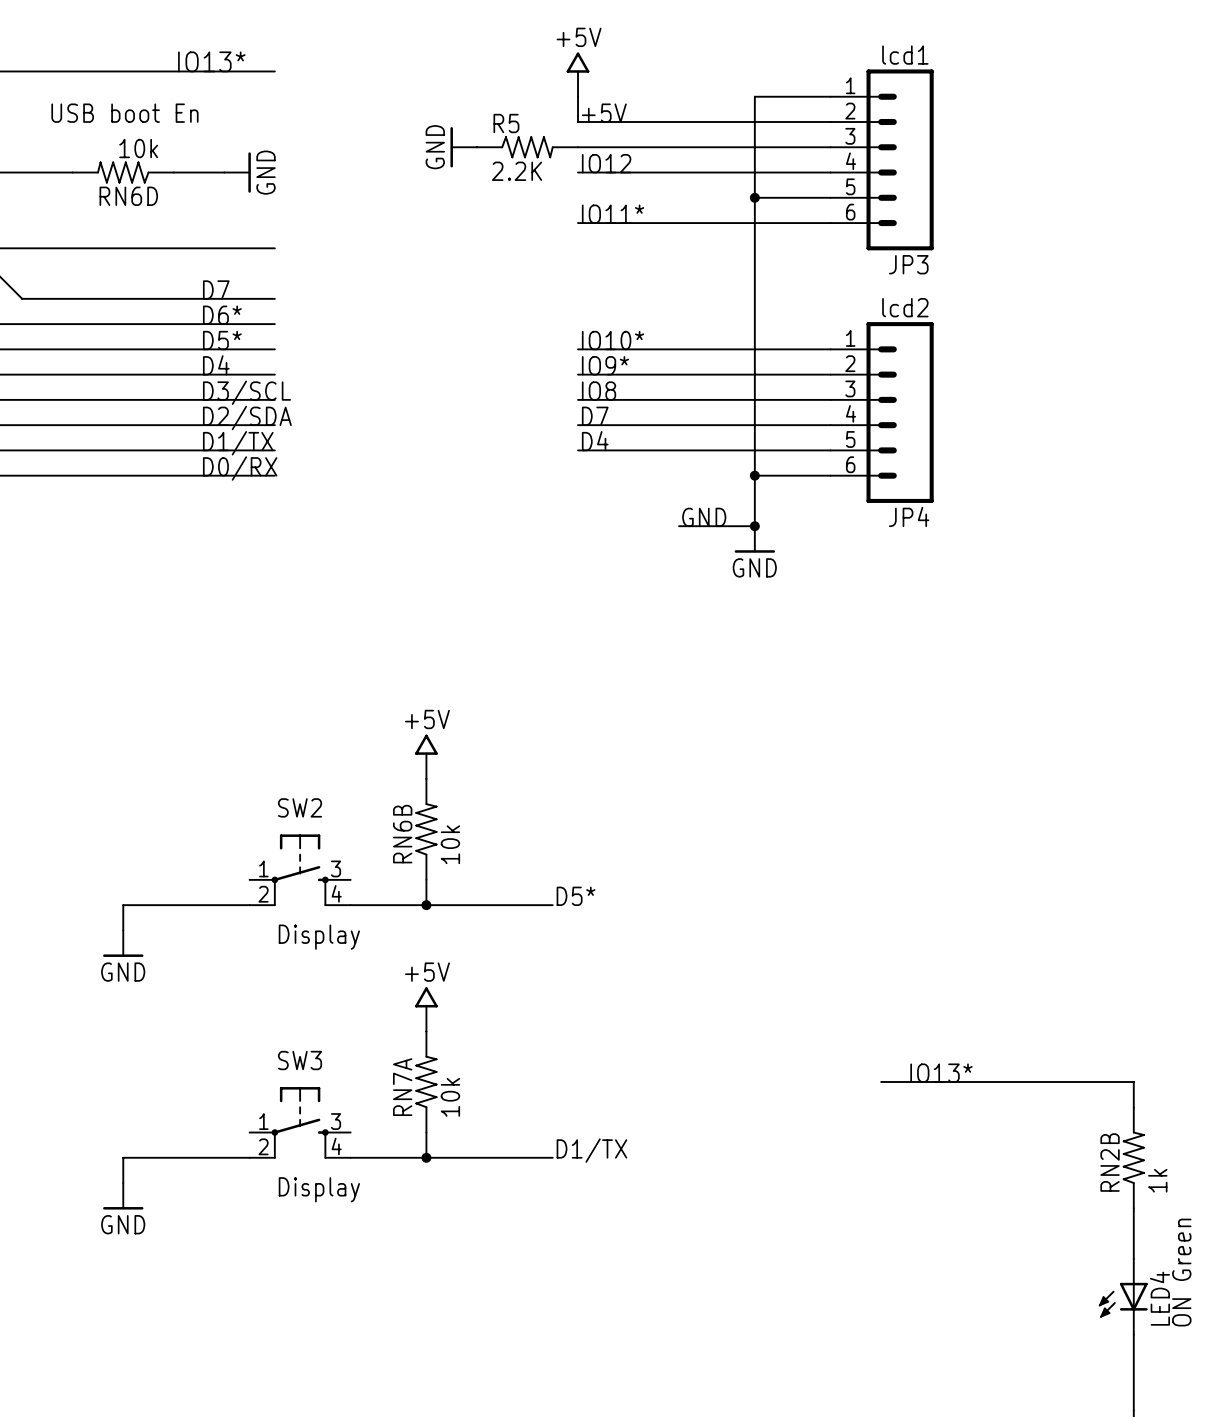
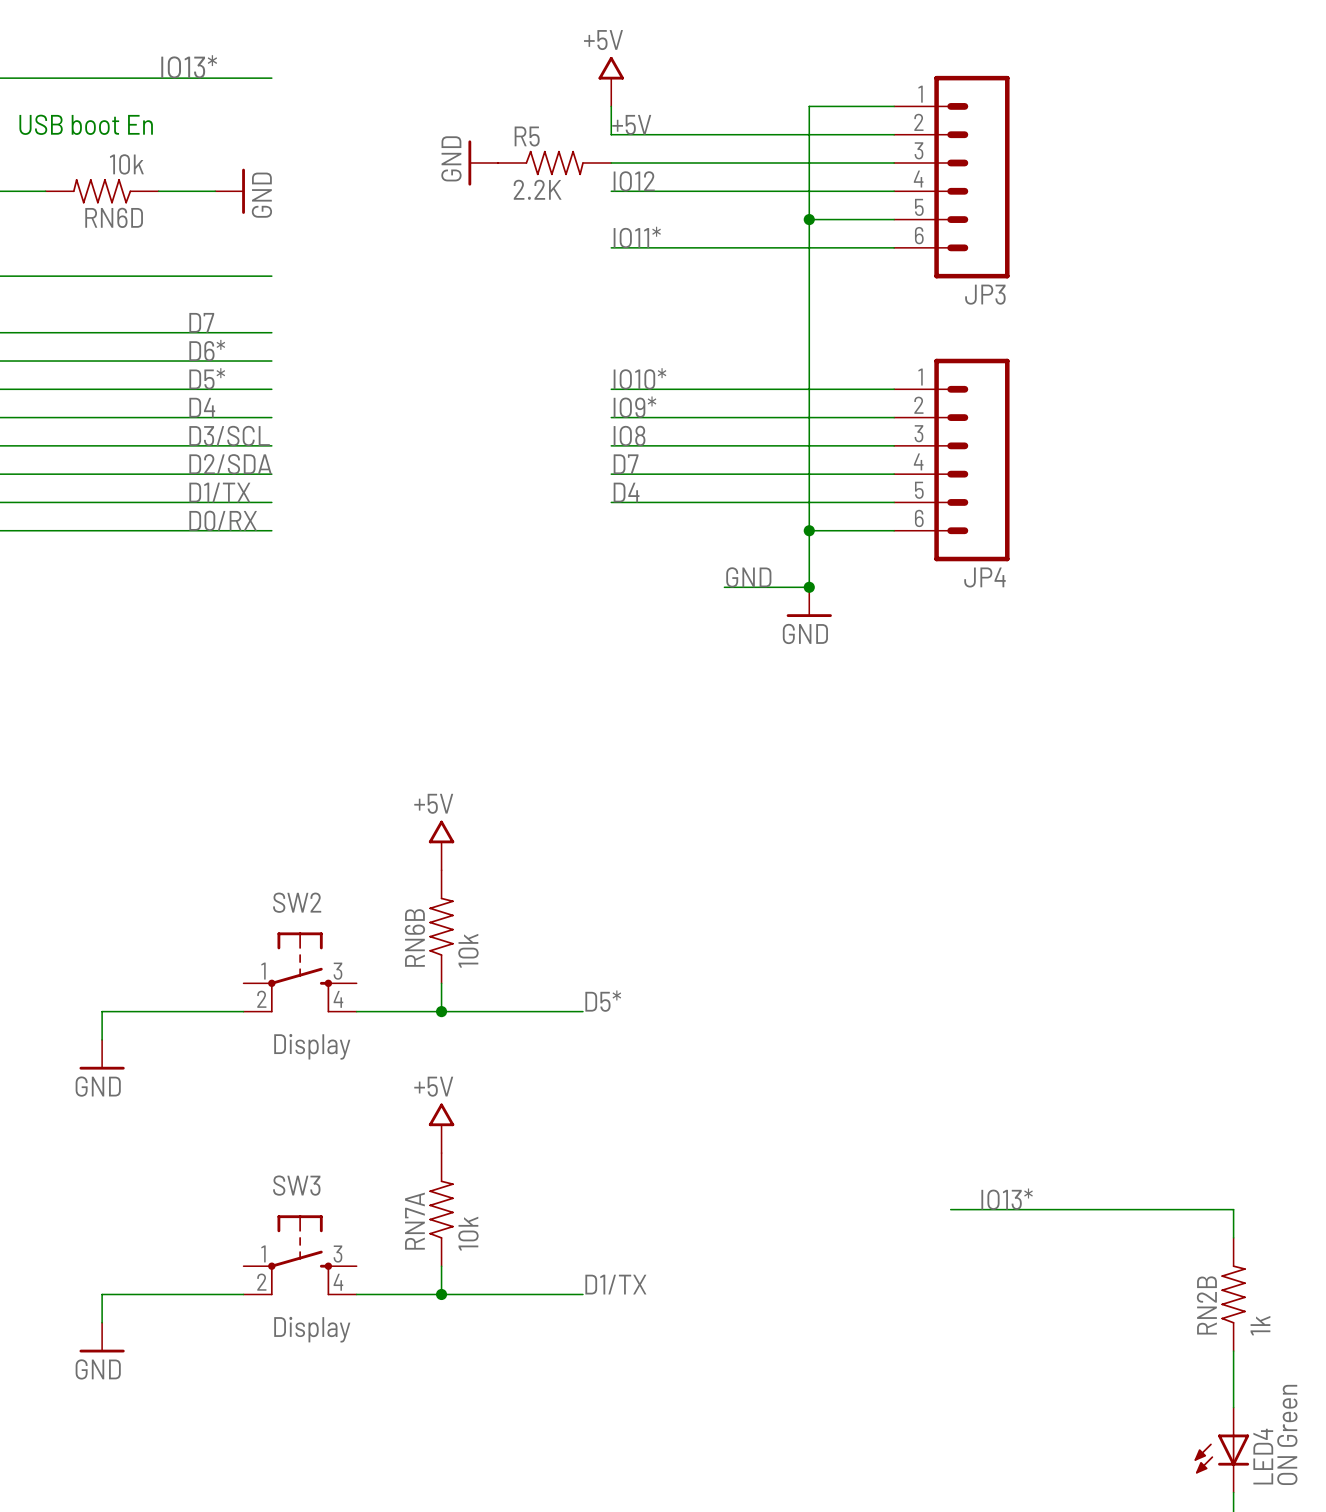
JP3 value: lcd1 (905, 55) -> none
JP4 value: lcd2 (905, 307) -> none

